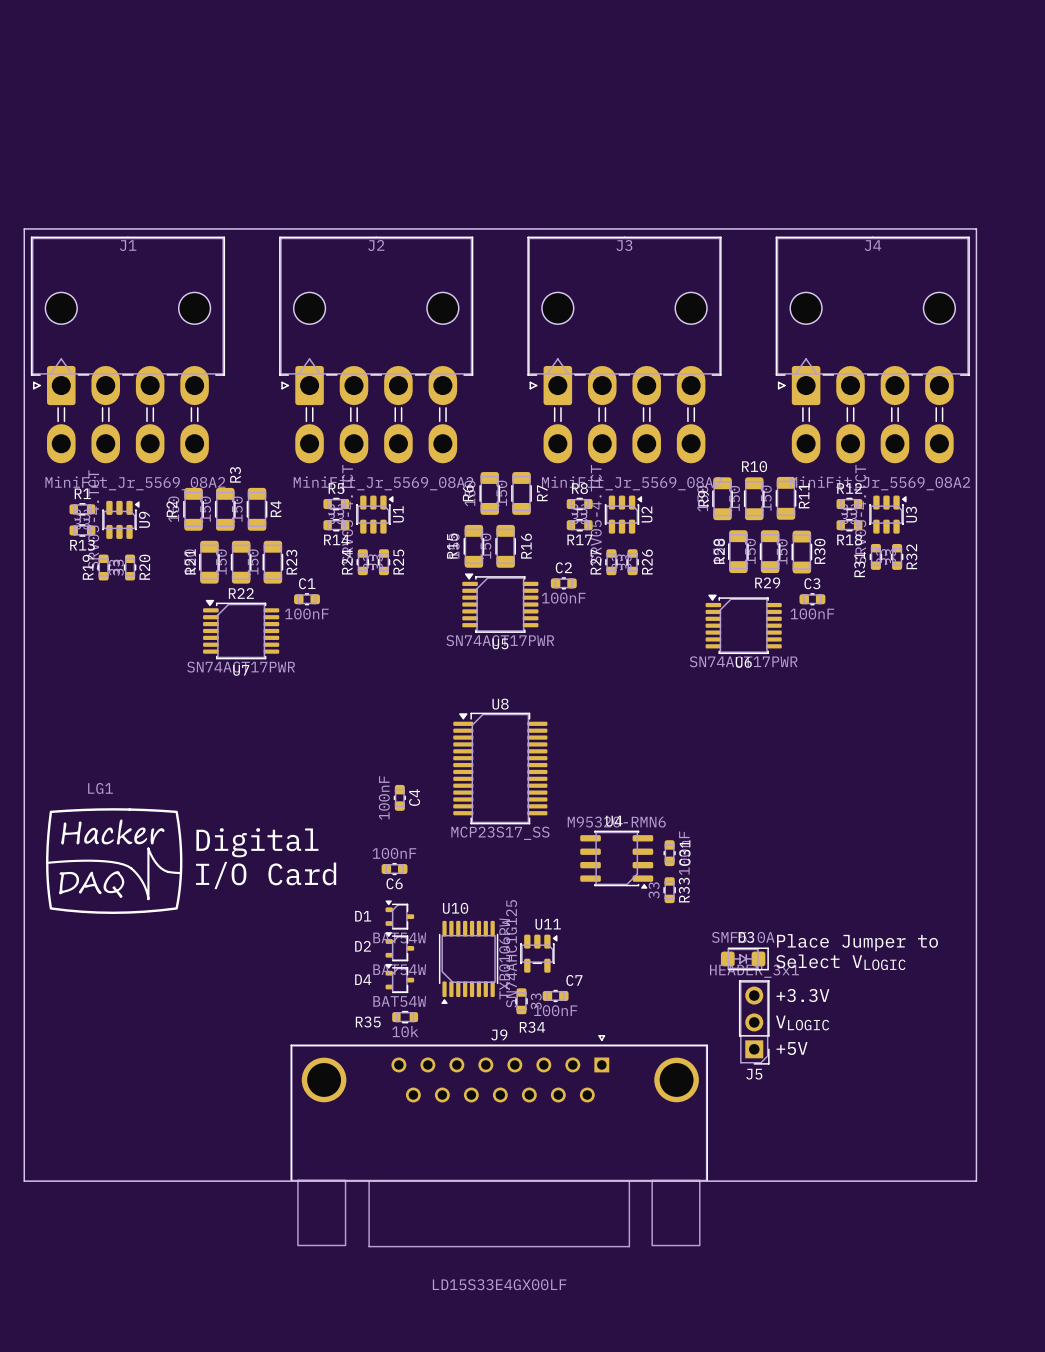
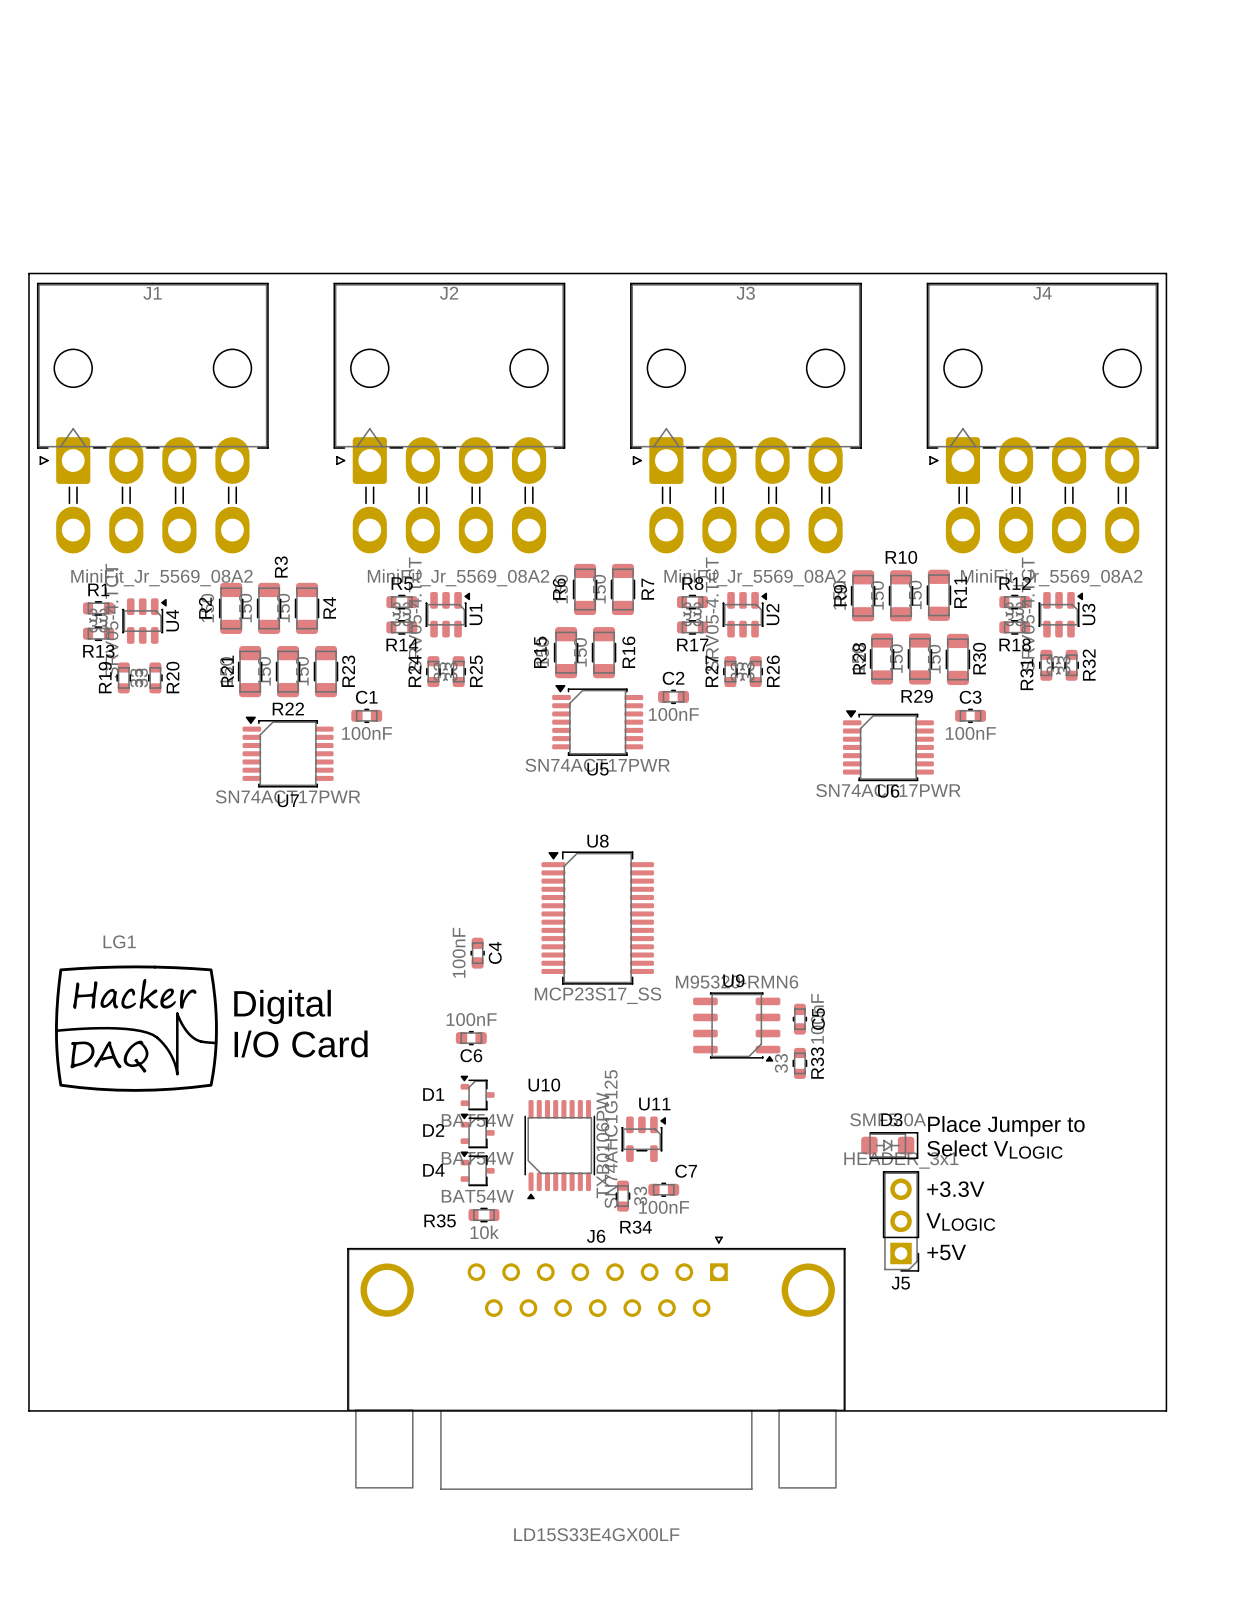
U9 name: U9 (144, 519) -> U4 (172, 620)
U4 name: U4 (614, 821) -> U9 (733, 980)
C31 name: C31 (685, 852) -> C5 (818, 1019)
J9 name: J9 (499, 1034) -> J6 (596, 1236)

